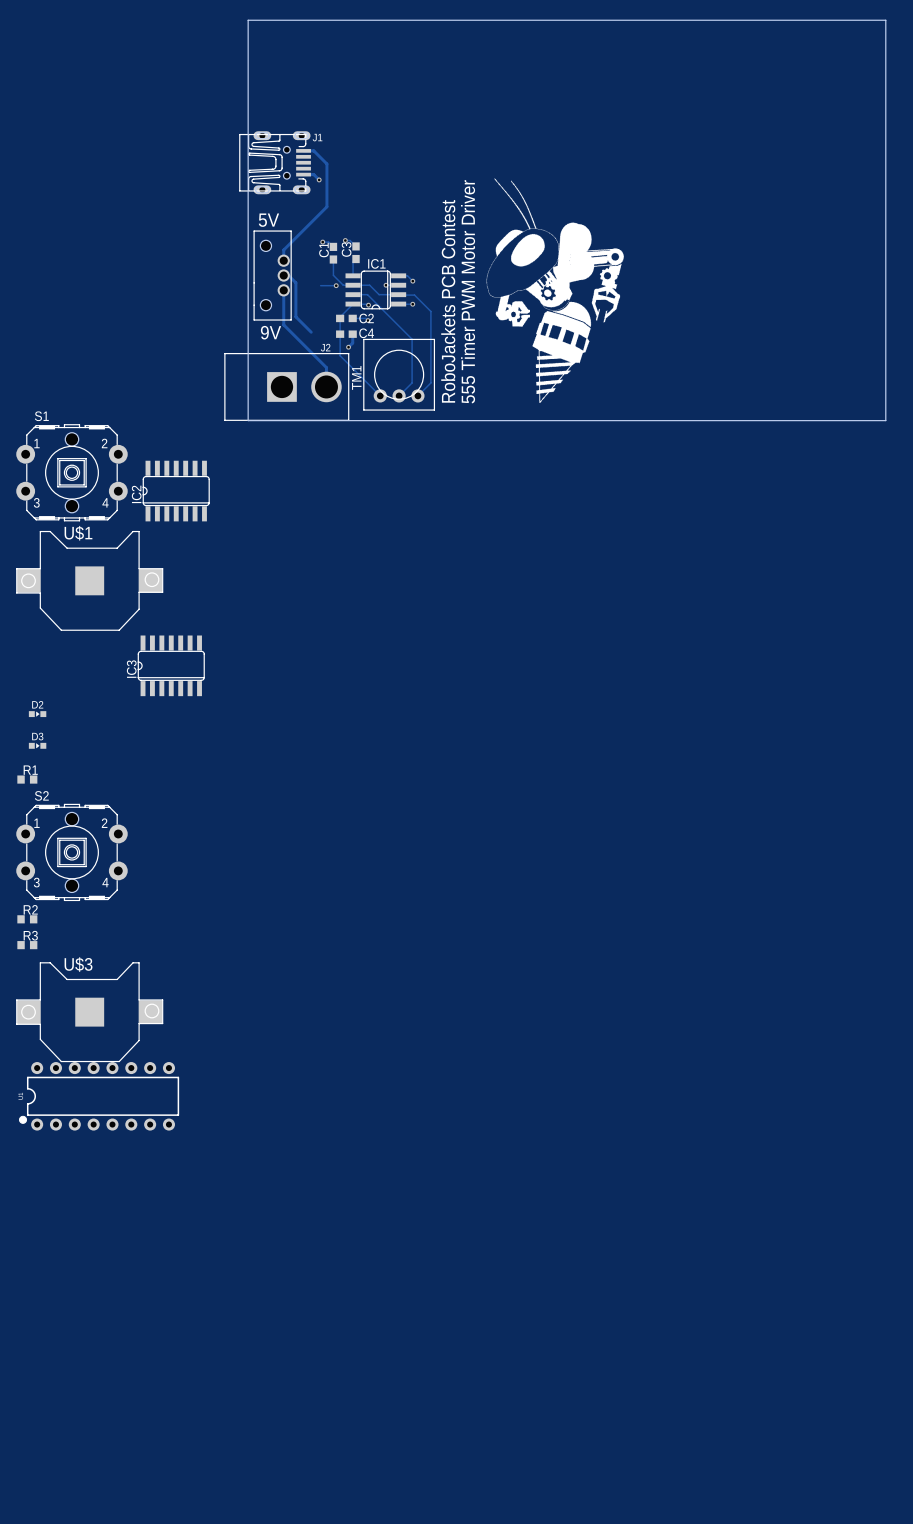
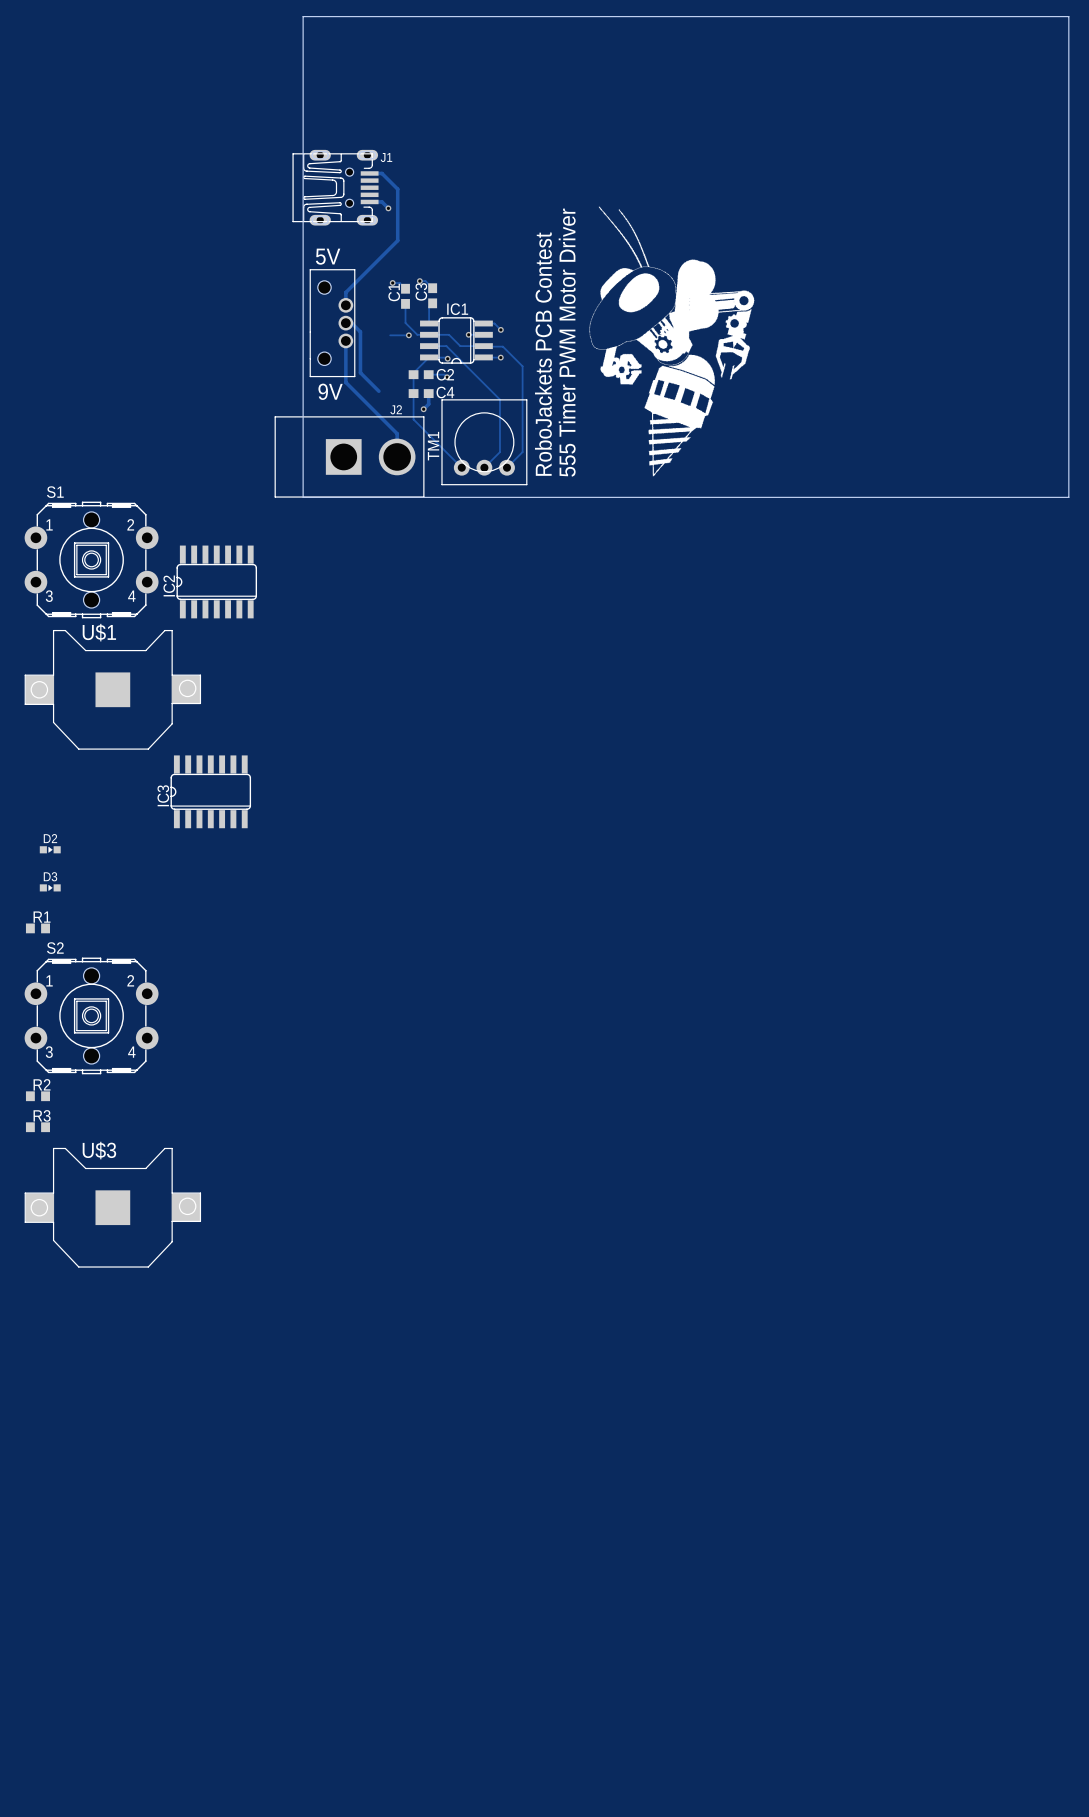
part: (99, 1096) -> none

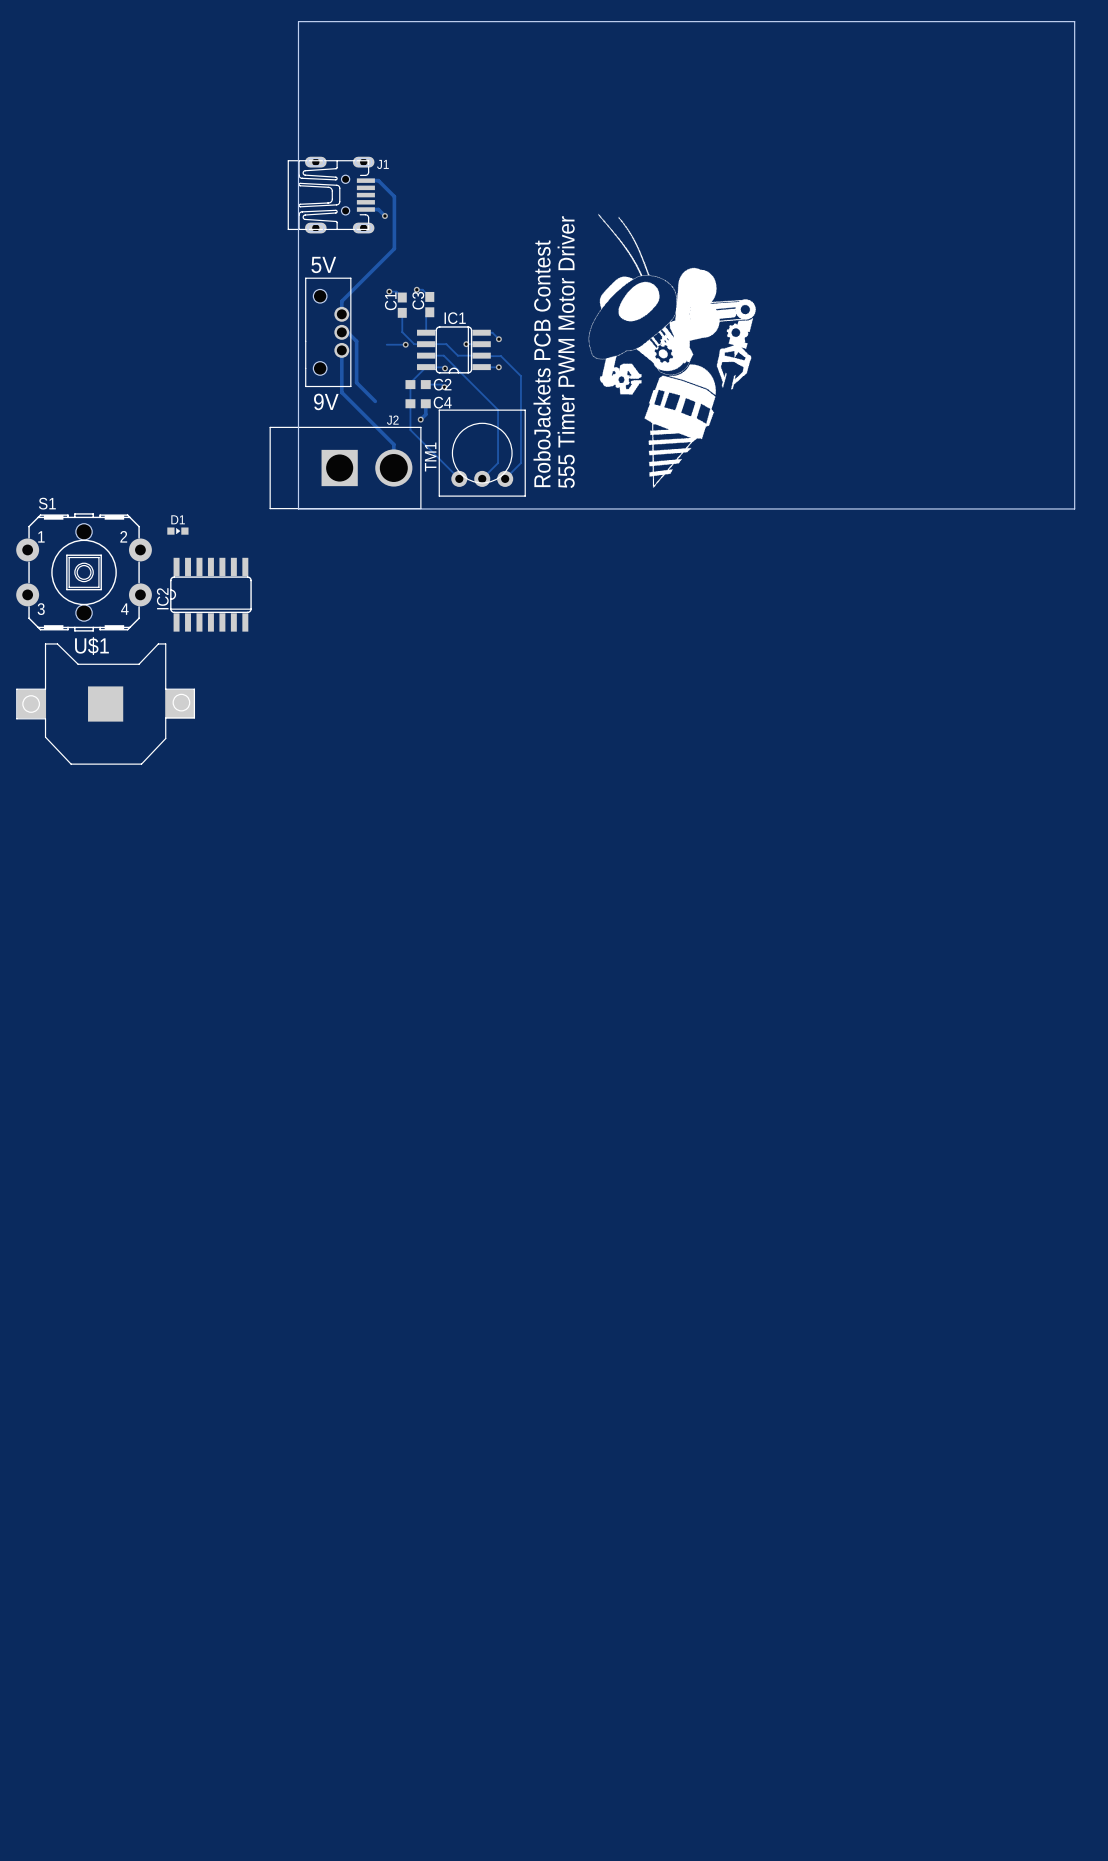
D1: none -> (177, 531)
IC3: (210, 791) -> none
D2: (50, 849) -> none
D3: (50, 887) -> none
R1: (37, 928) -> none
S2: (91, 1015) -> none
R2: (37, 1096) -> none
R3: (37, 1127) -> none
U$3: (112, 1207) -> none

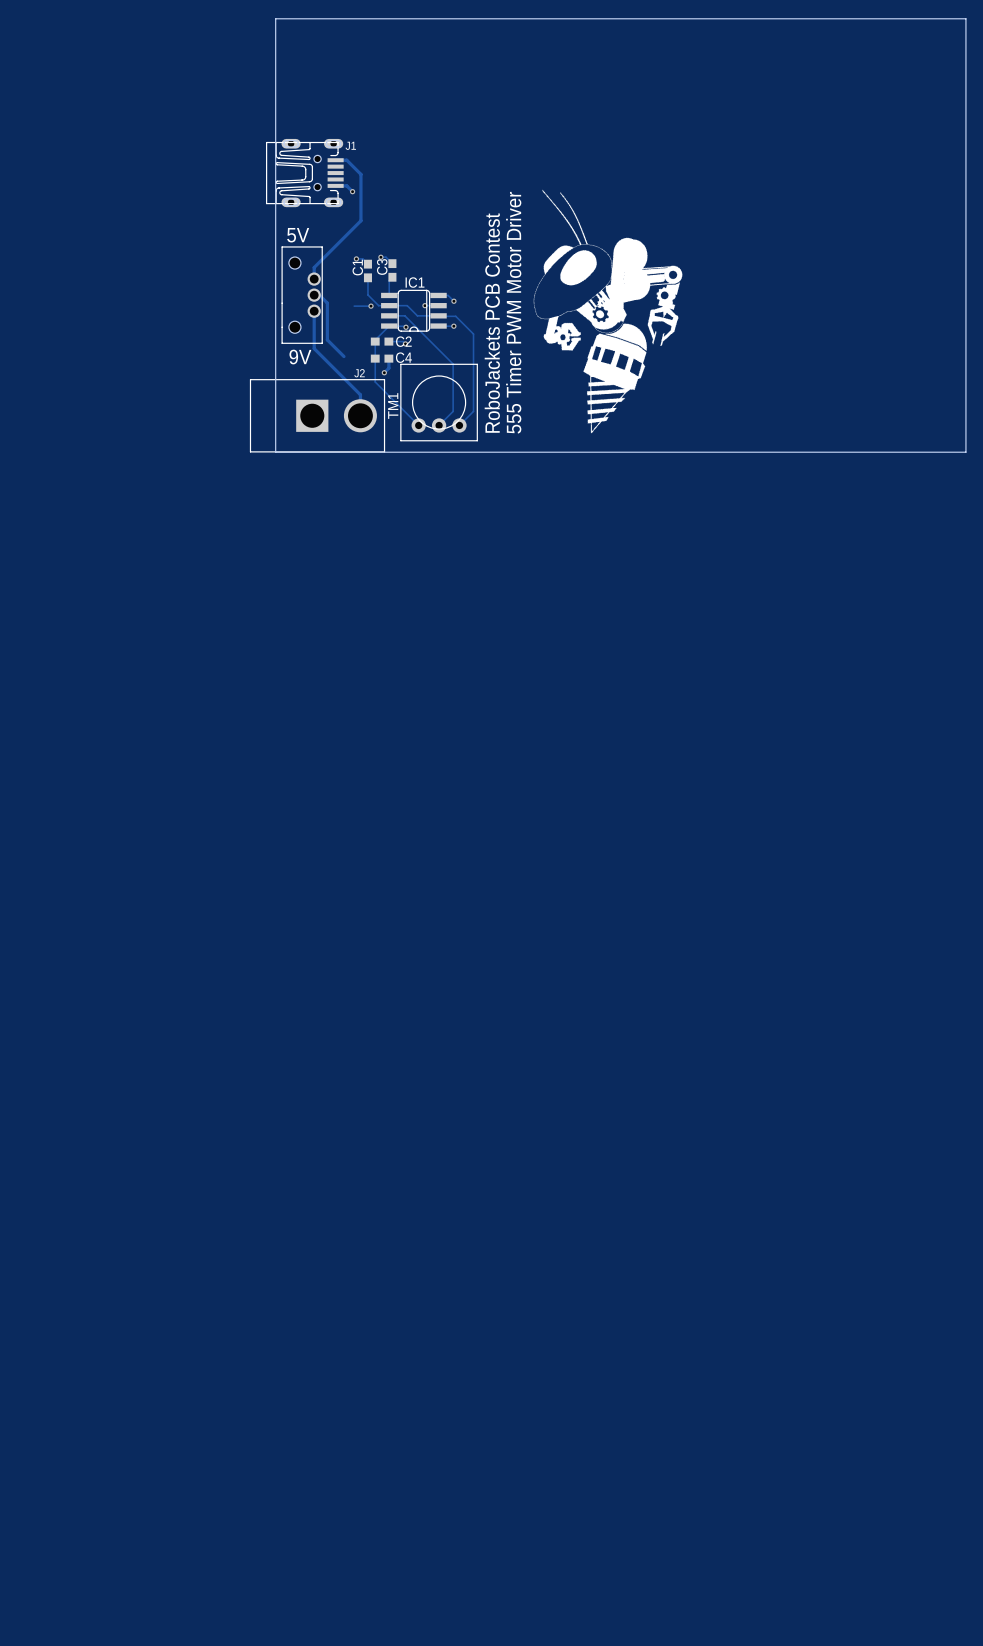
D1: (177, 531) -> none
S1: (84, 572) -> none
IC2: (210, 594) -> none
U$1: (105, 704) -> none

